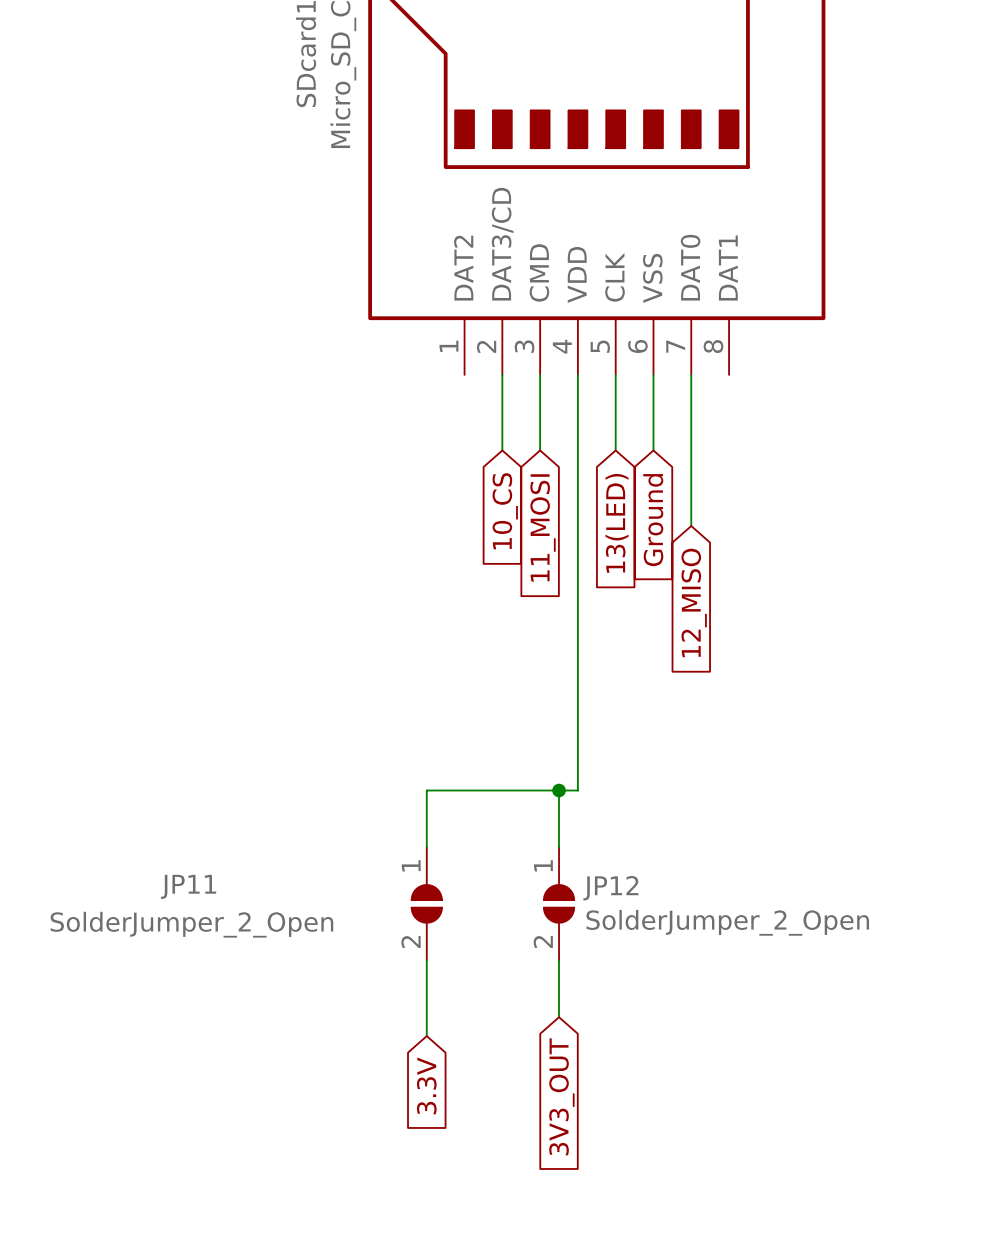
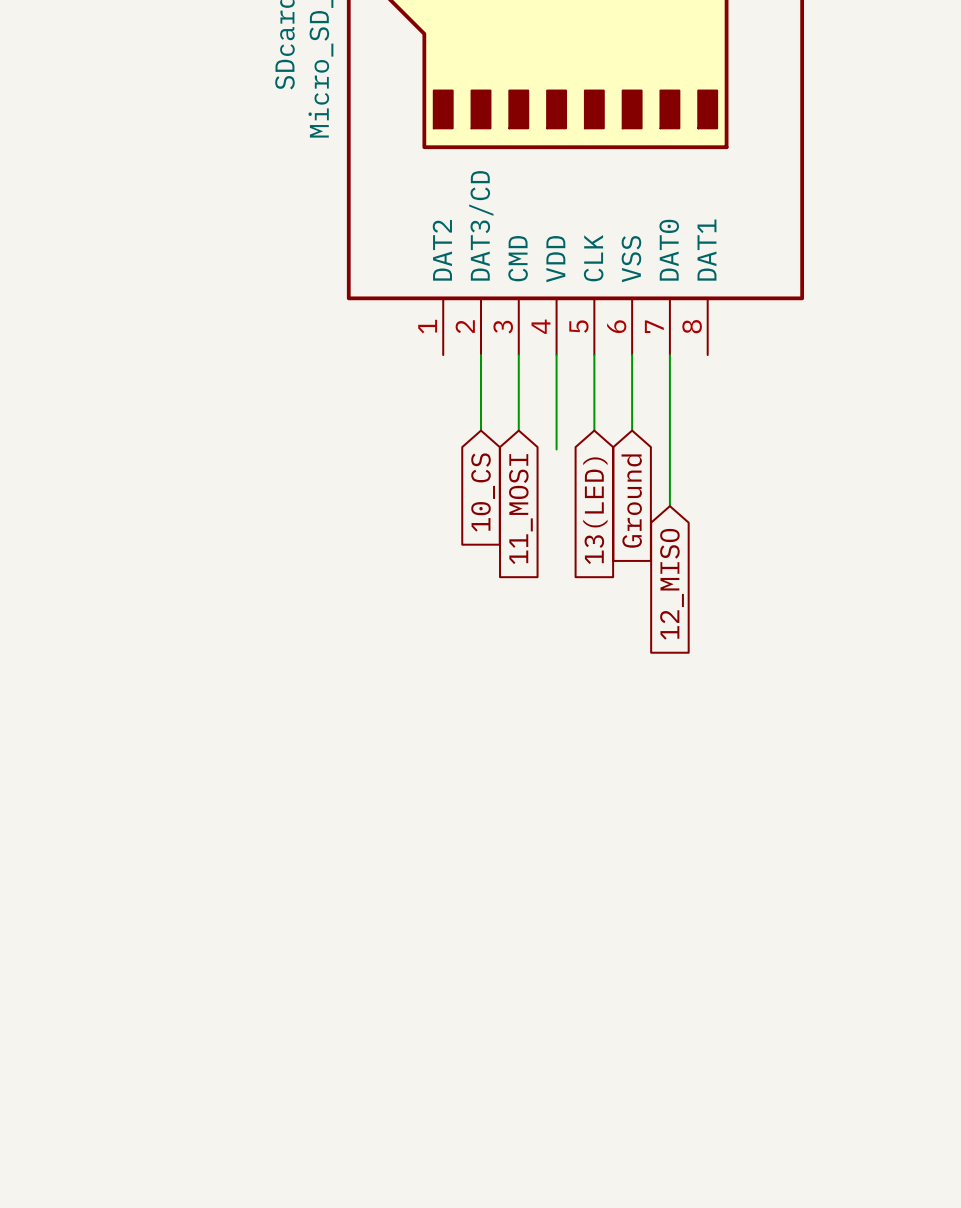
wire: (577, 469) (577, 790) (426, 790) (426, 847) -> none
wire: (559, 790) (559, 847) -> none
junction: (559, 790) -> none
JP11: SolderJumper_2_Open (426, 903) -> none
JP12: SolderJumper_2_Open (559, 903) -> none
wire: (426, 960) (426, 1036) -> none
wire: (559, 960) (559, 1017) -> none
global label: 3.3V (426, 1085) -> none
global label: 3V3_OUT (561, 1096) -> none

